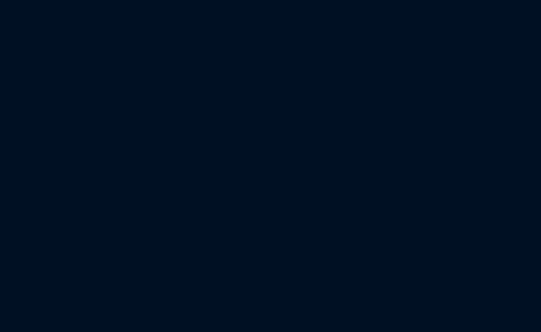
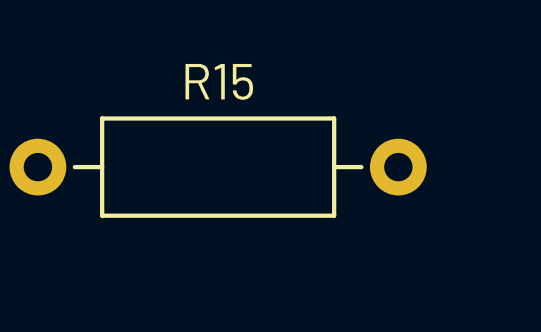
R15: none -> (218, 167)

